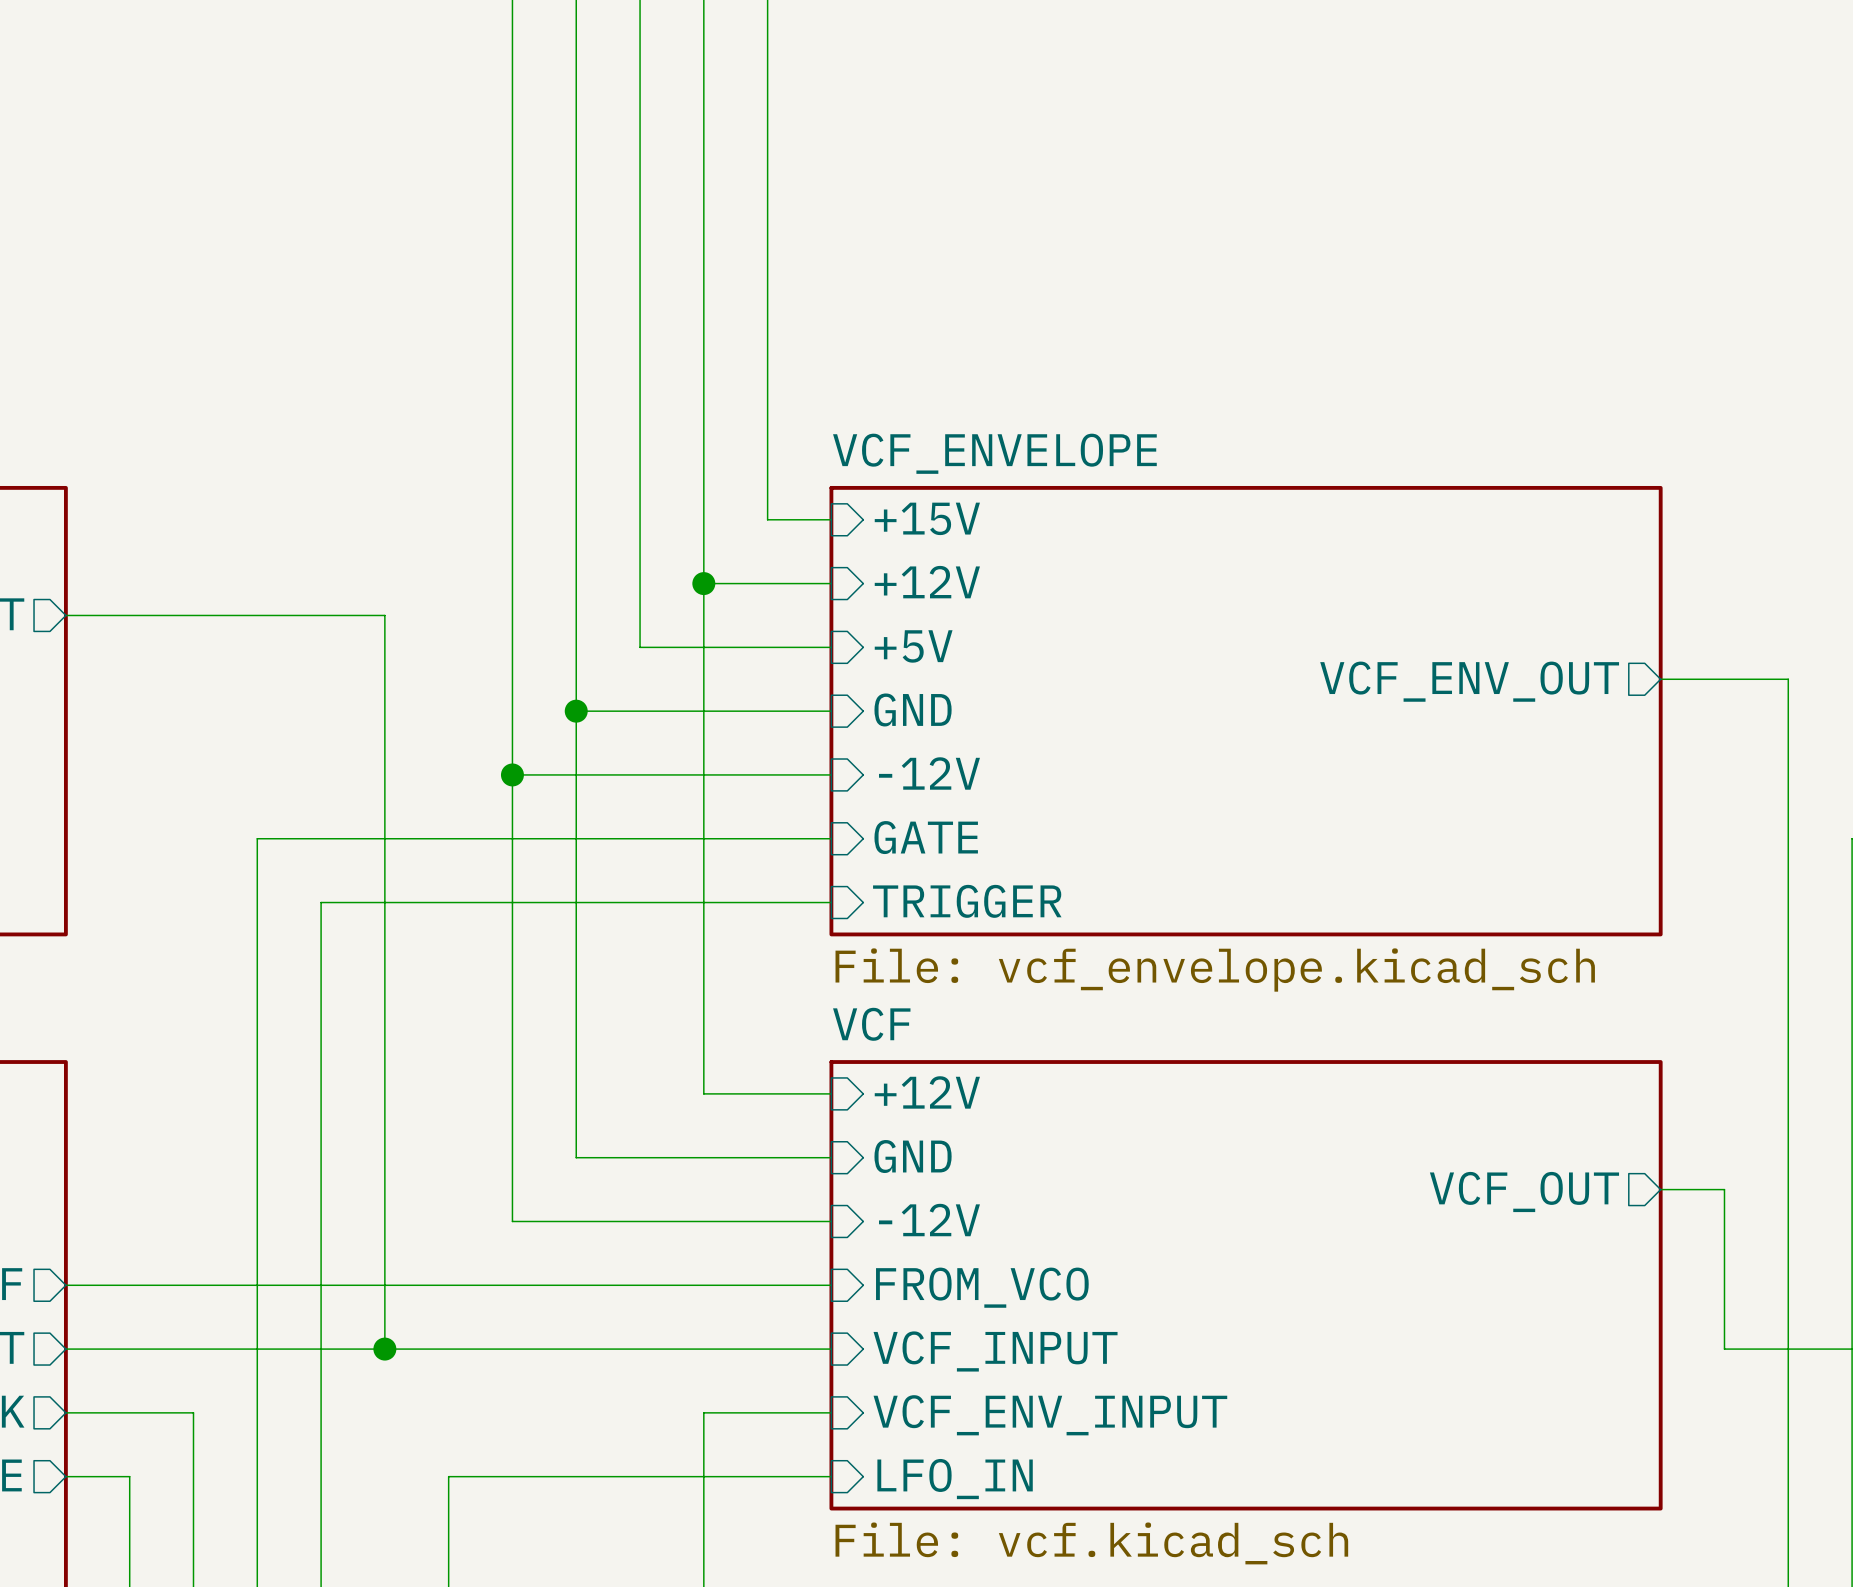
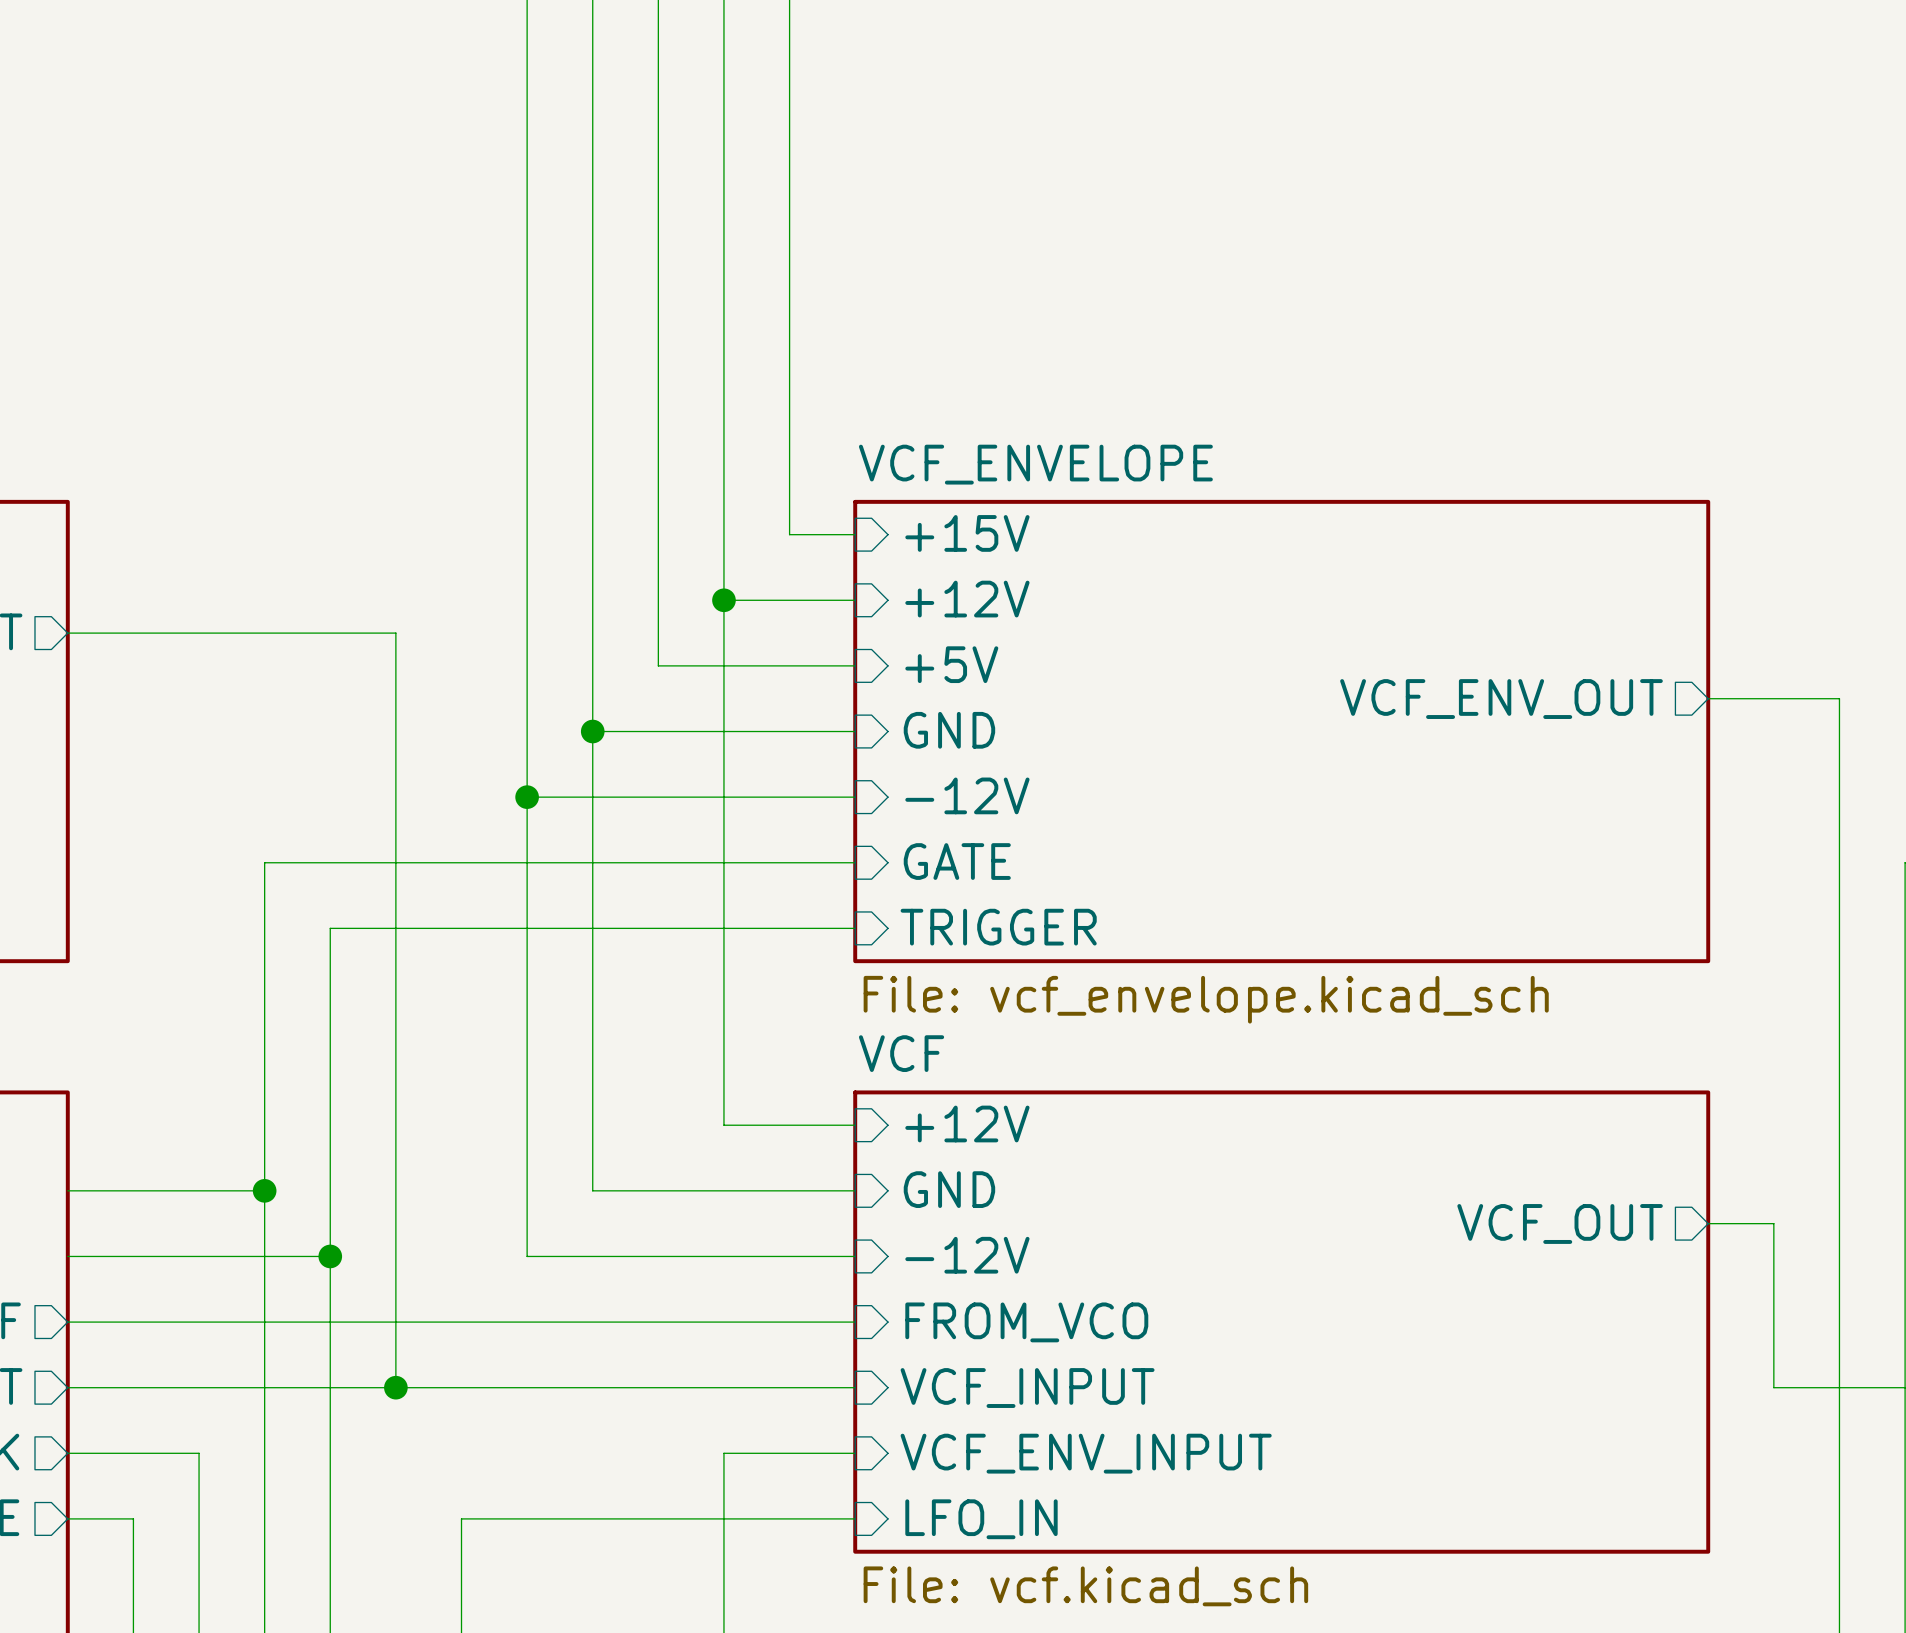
wire: none -> (67, 1190) (264, 1190)
junction: none -> (264, 1190)
wire: none -> (67, 1256) (330, 1256)
junction: none -> (330, 1256)

